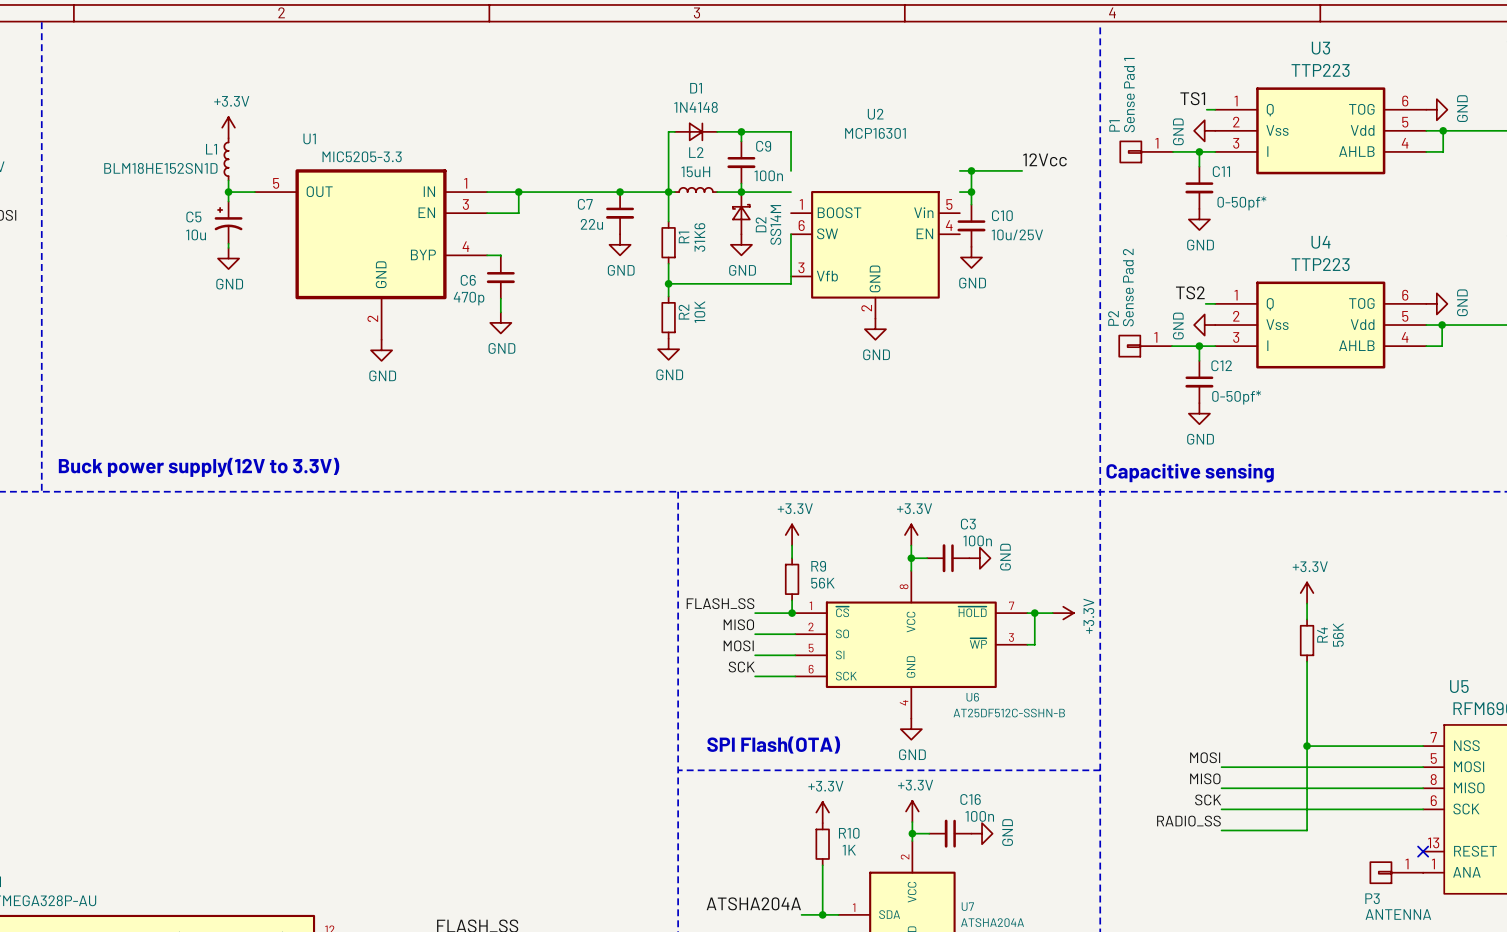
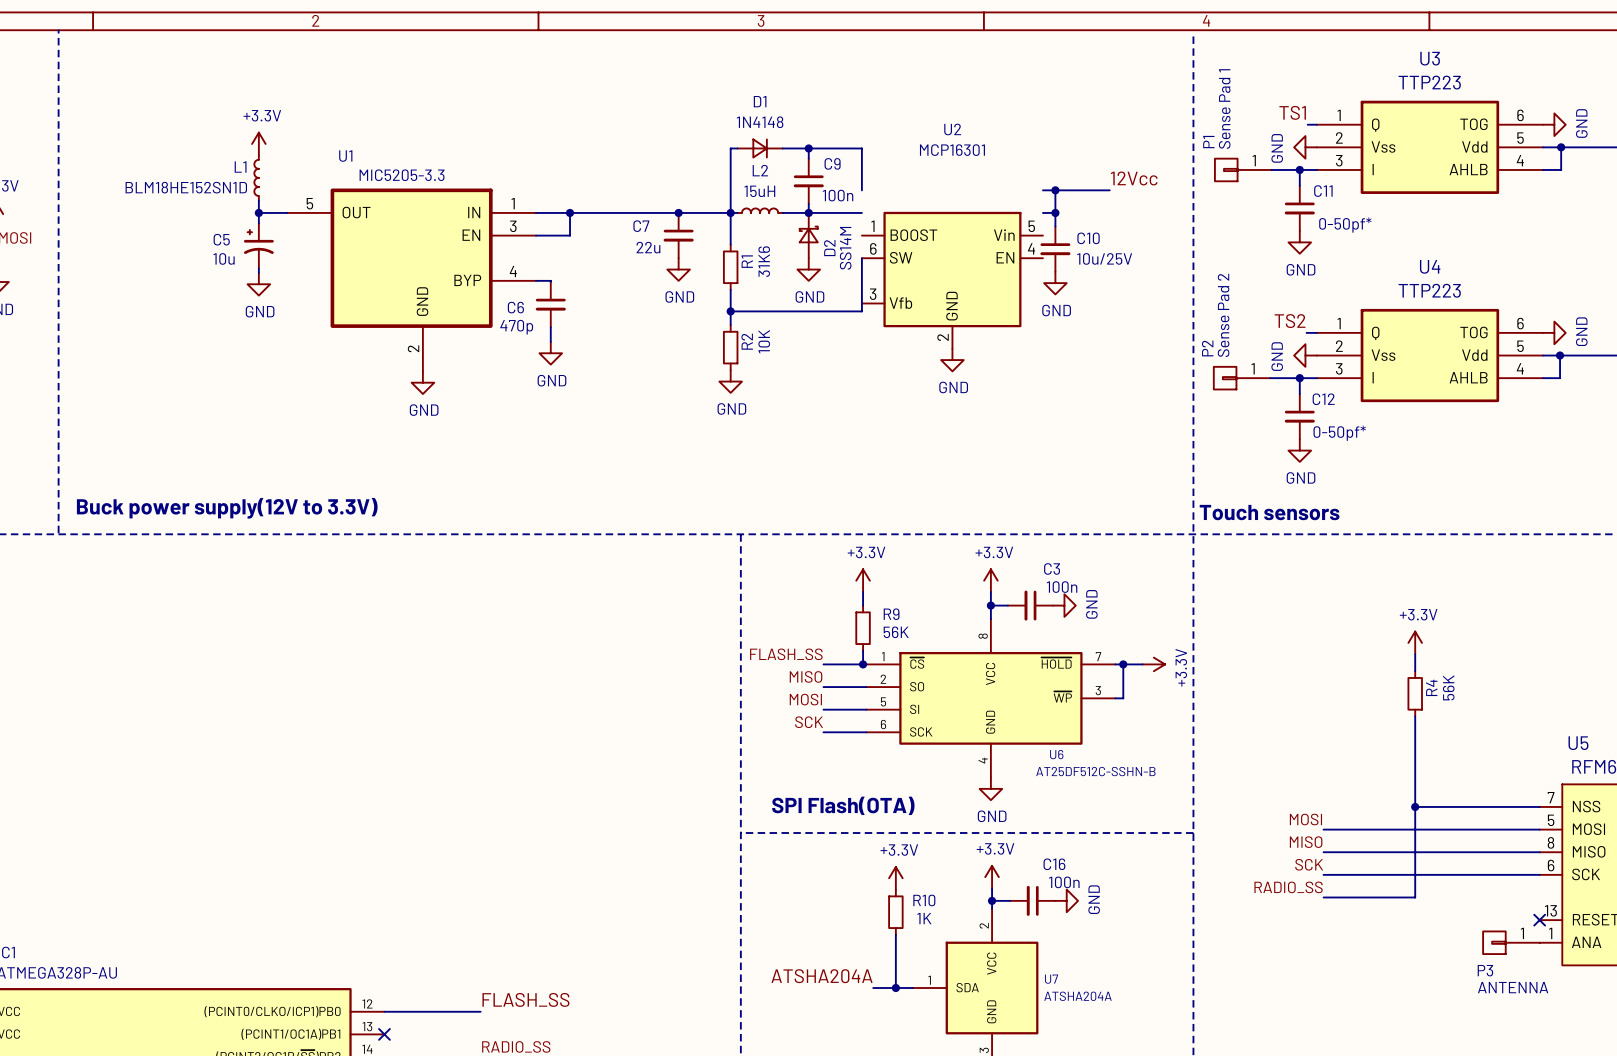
text: Capacitive sensing (1190, 473) -> Touch sensors (1269, 512)

